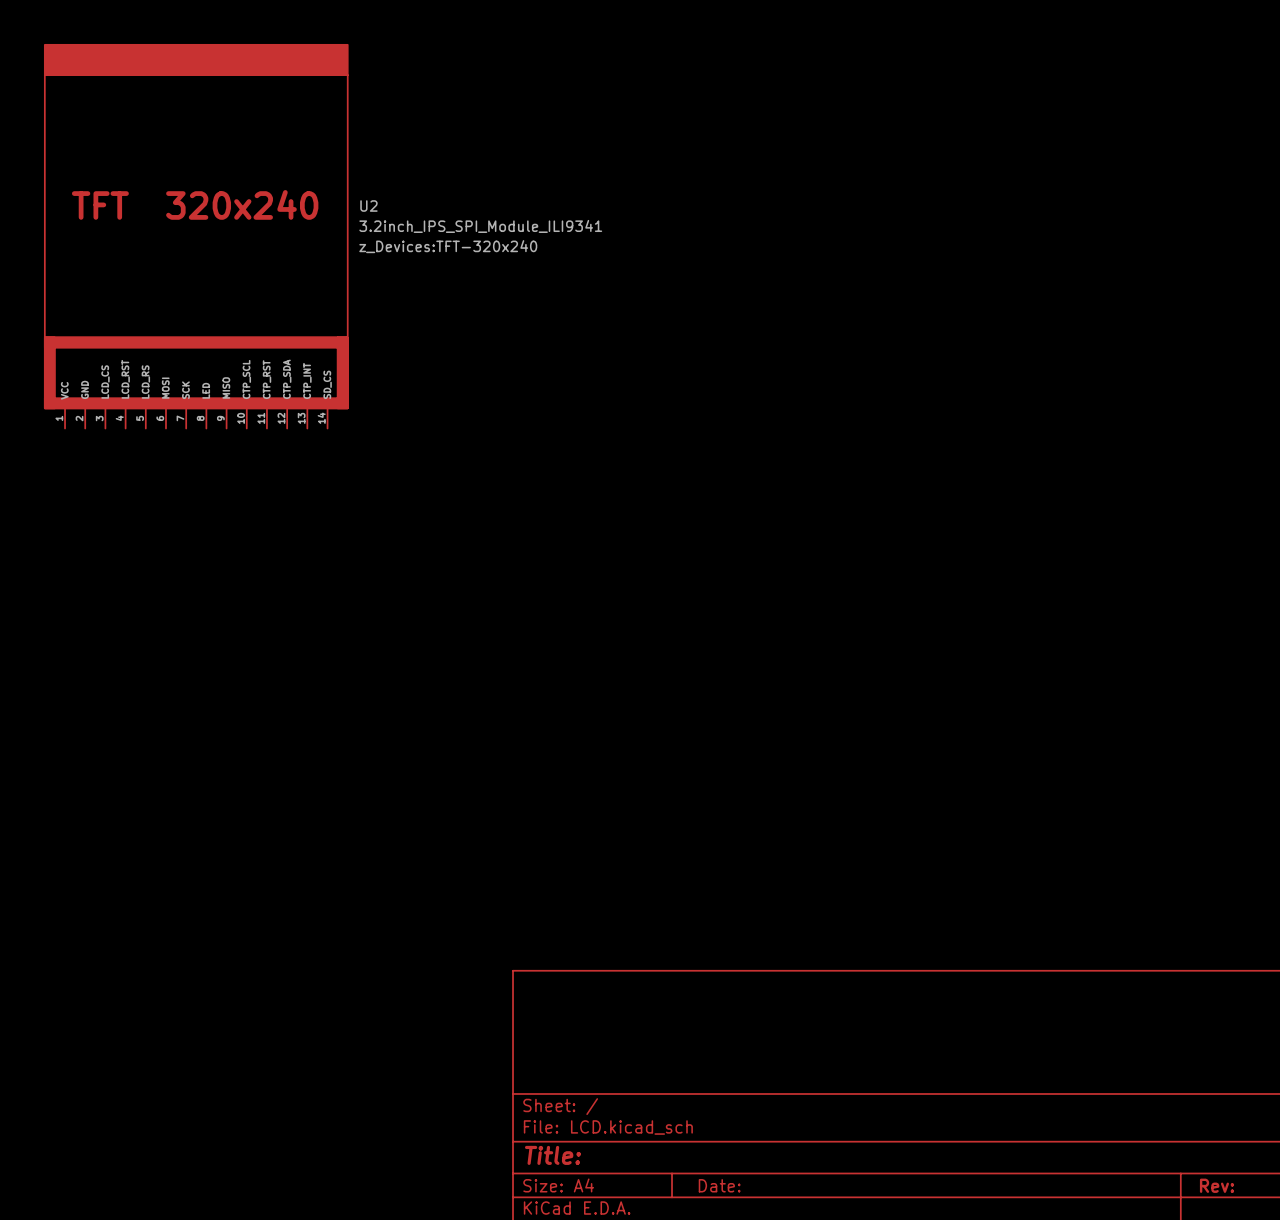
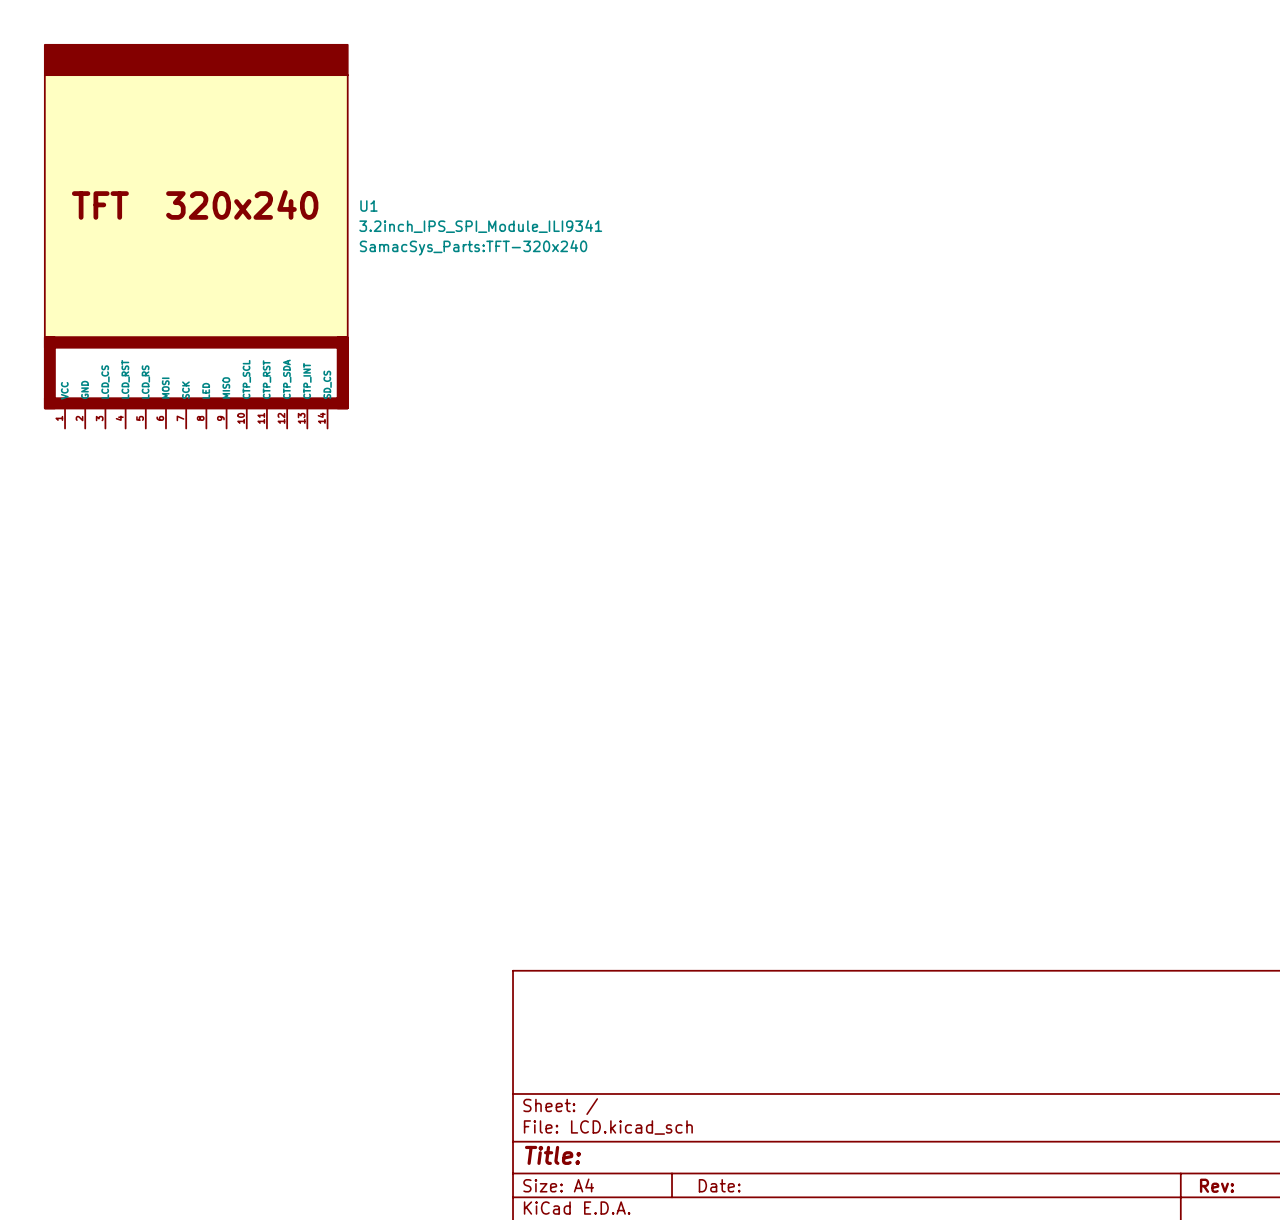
U2 name: U2 (368, 206) -> U1 (368, 206)
U2 text: z_Devices:TFT-320x240 (448, 246) -> SamacSys_Parts:TFT-320x240 (473, 247)

